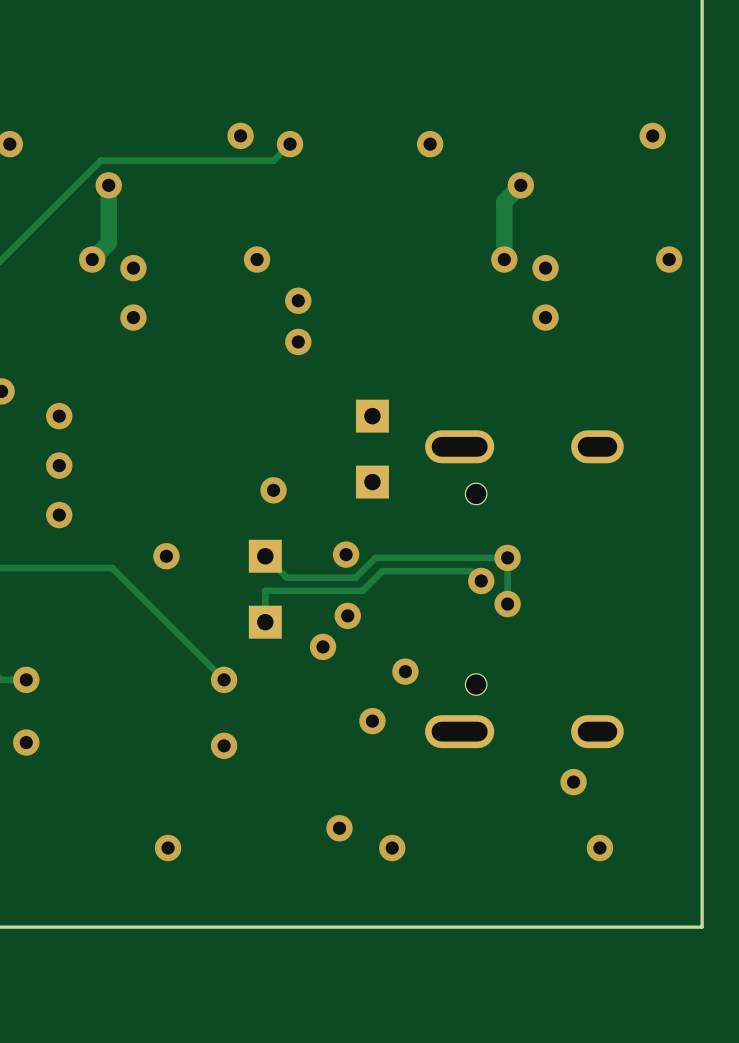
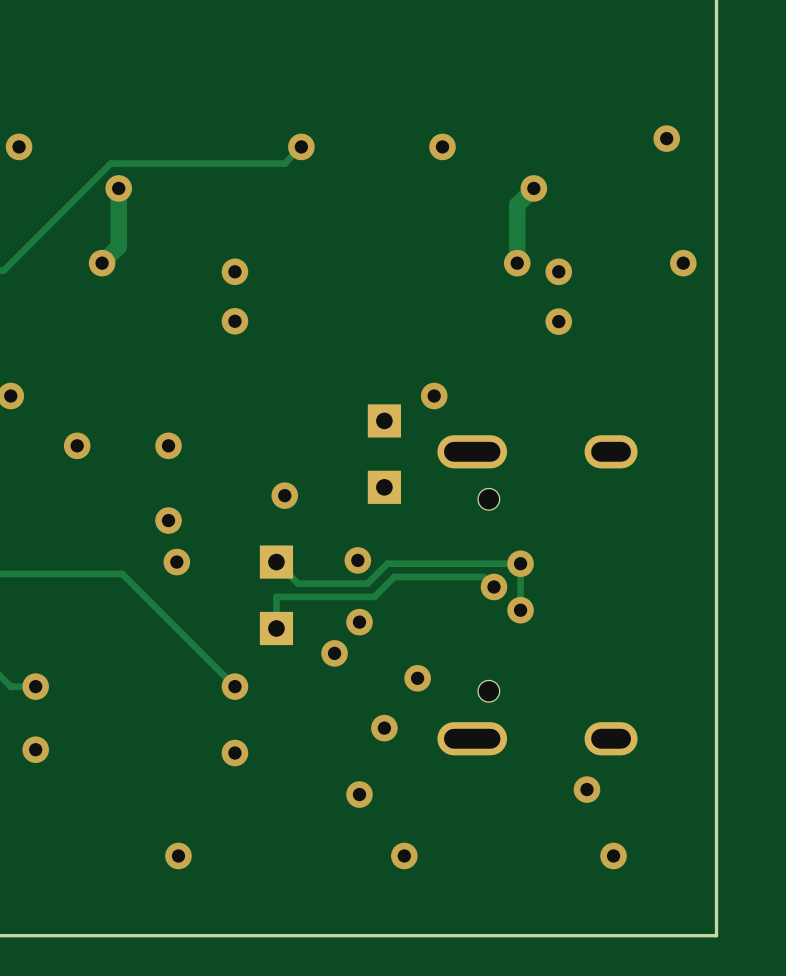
via: (240, 135) -> none
via: (257, 259) -> none
via: (133, 268) -> none
via: none -> (234, 271)
via: (298, 300) -> none
via: (133, 317) -> none
via: none -> (234, 321)
via: (298, 341) -> none
via: none -> (434, 396)
via: (59, 416) -> none
via: none -> (77, 445)
via: none -> (168, 445)
via: (59, 465) -> none
via: (59, 515) -> none
via: none -> (168, 520)
via position: (339, 828) -> (359, 794)

